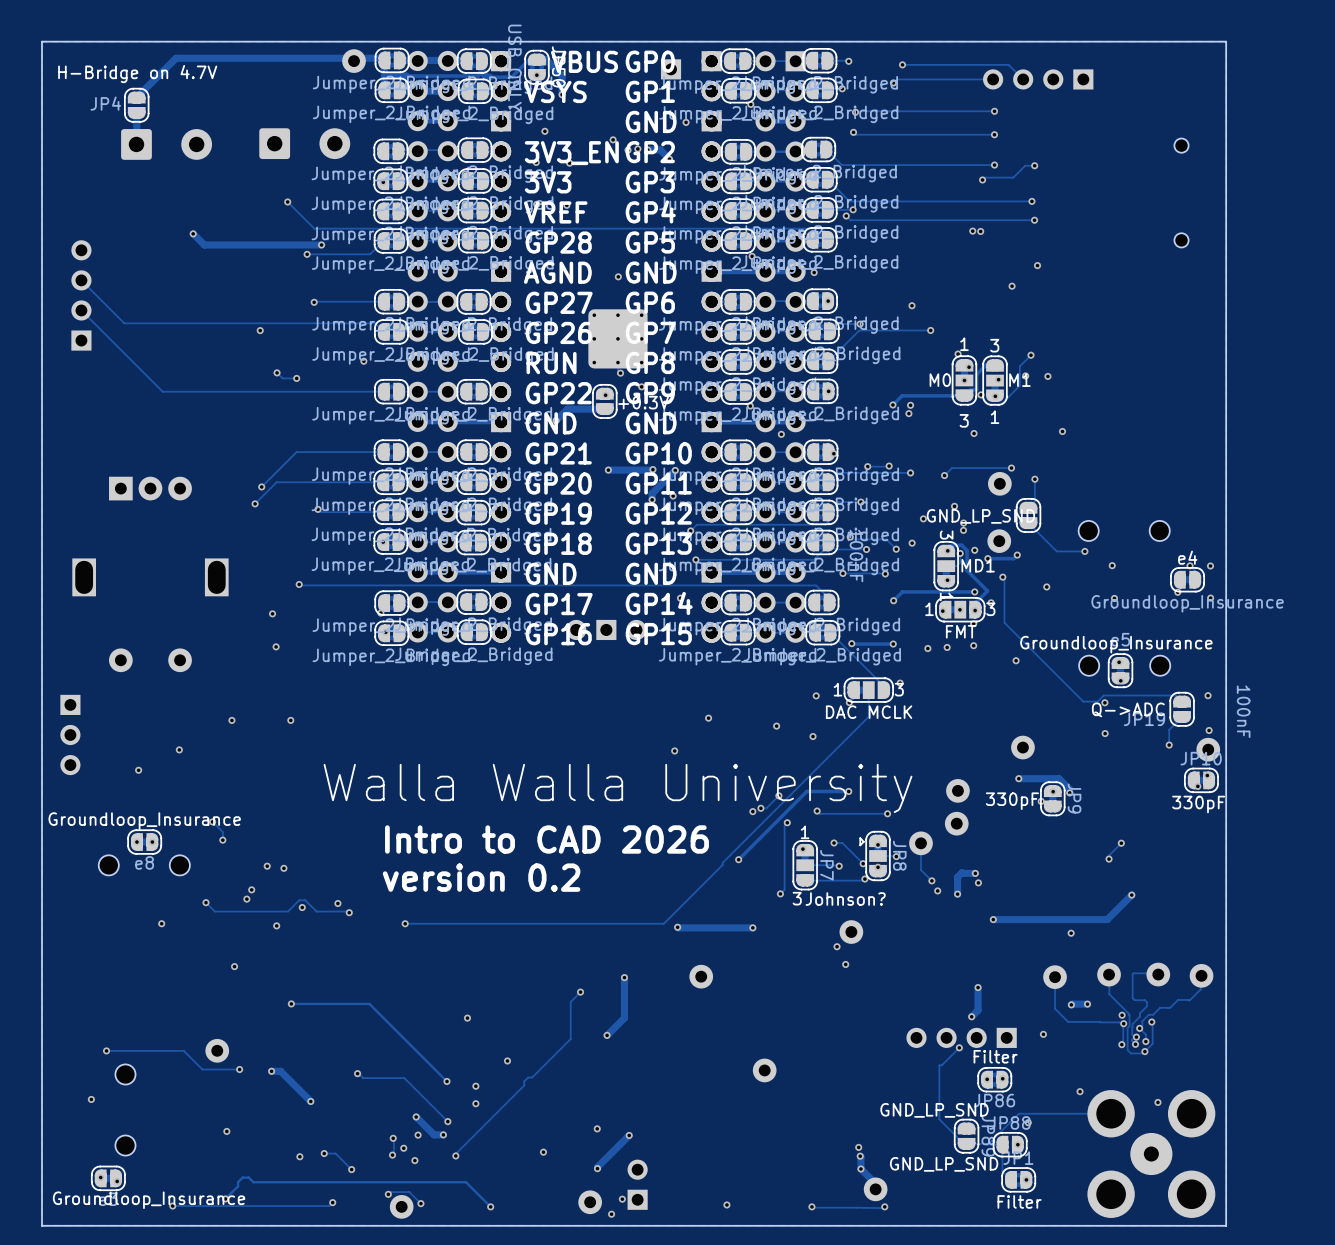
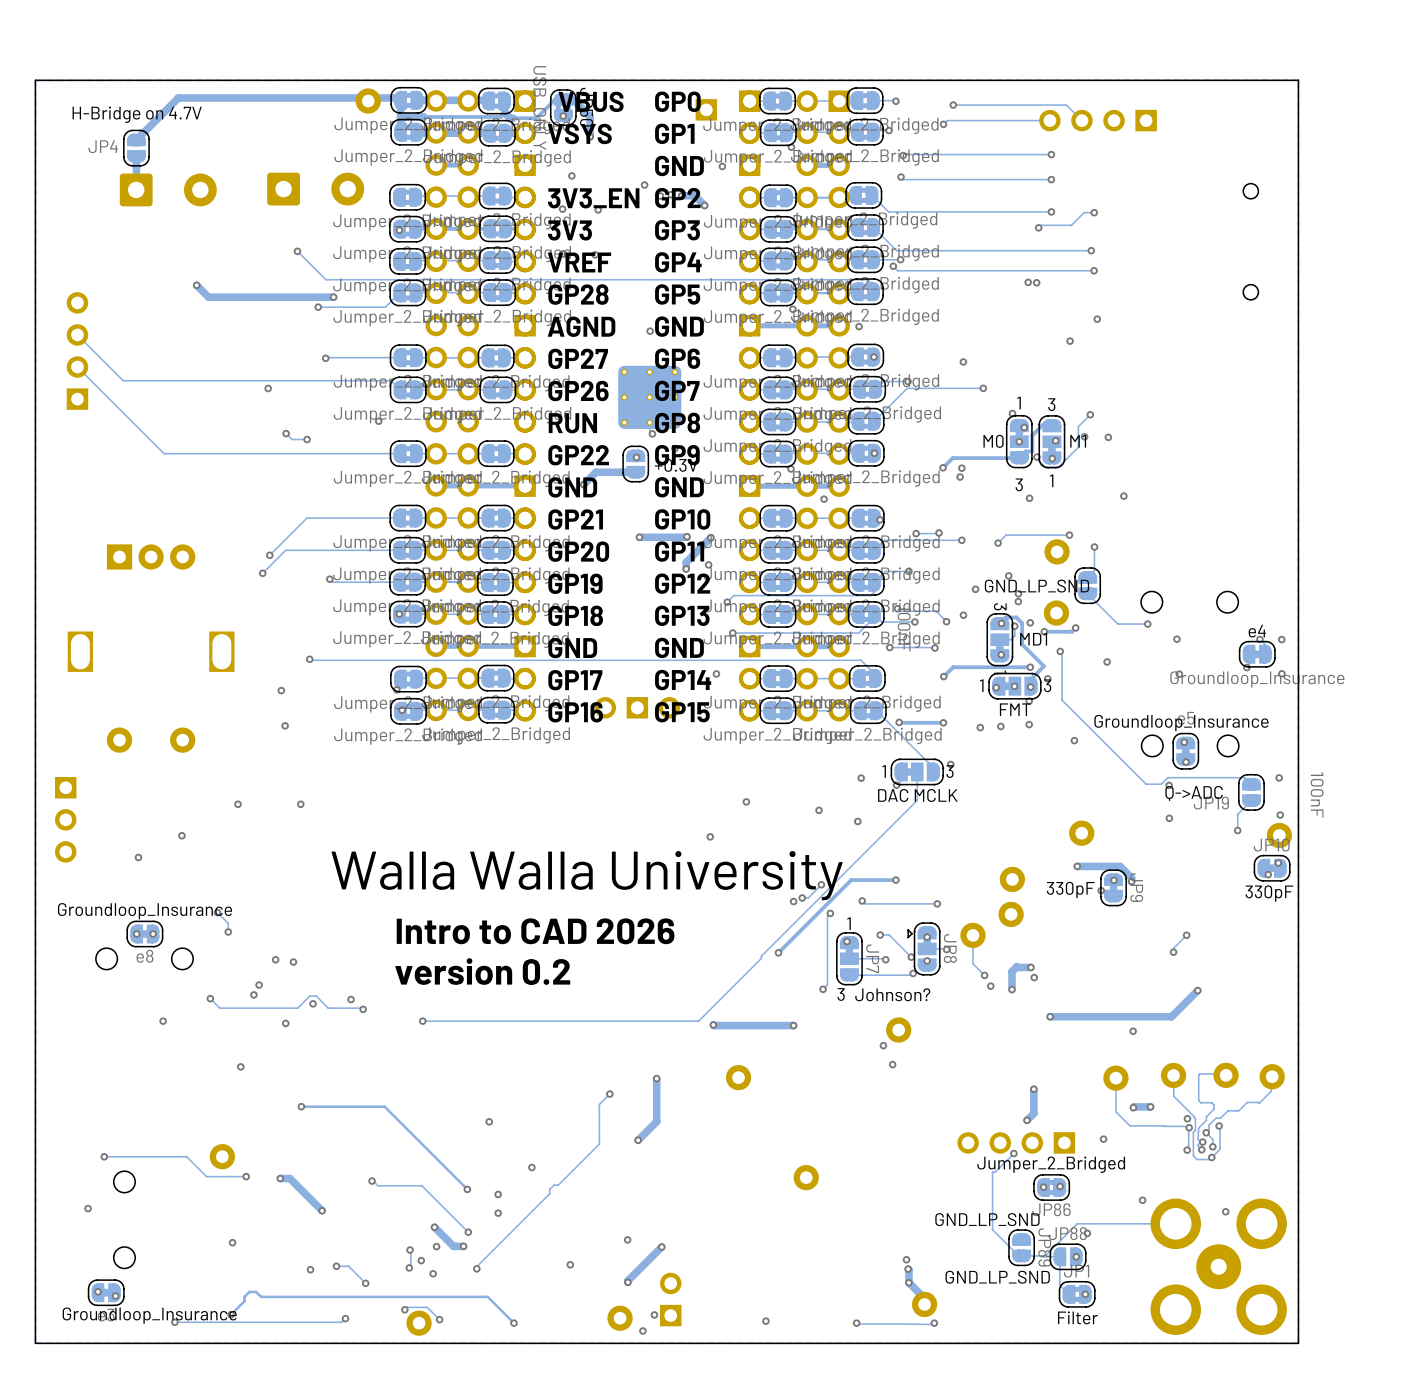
JP86 value: Filter (995, 1056) -> Jumper_2_Bridged (1051, 1164)

